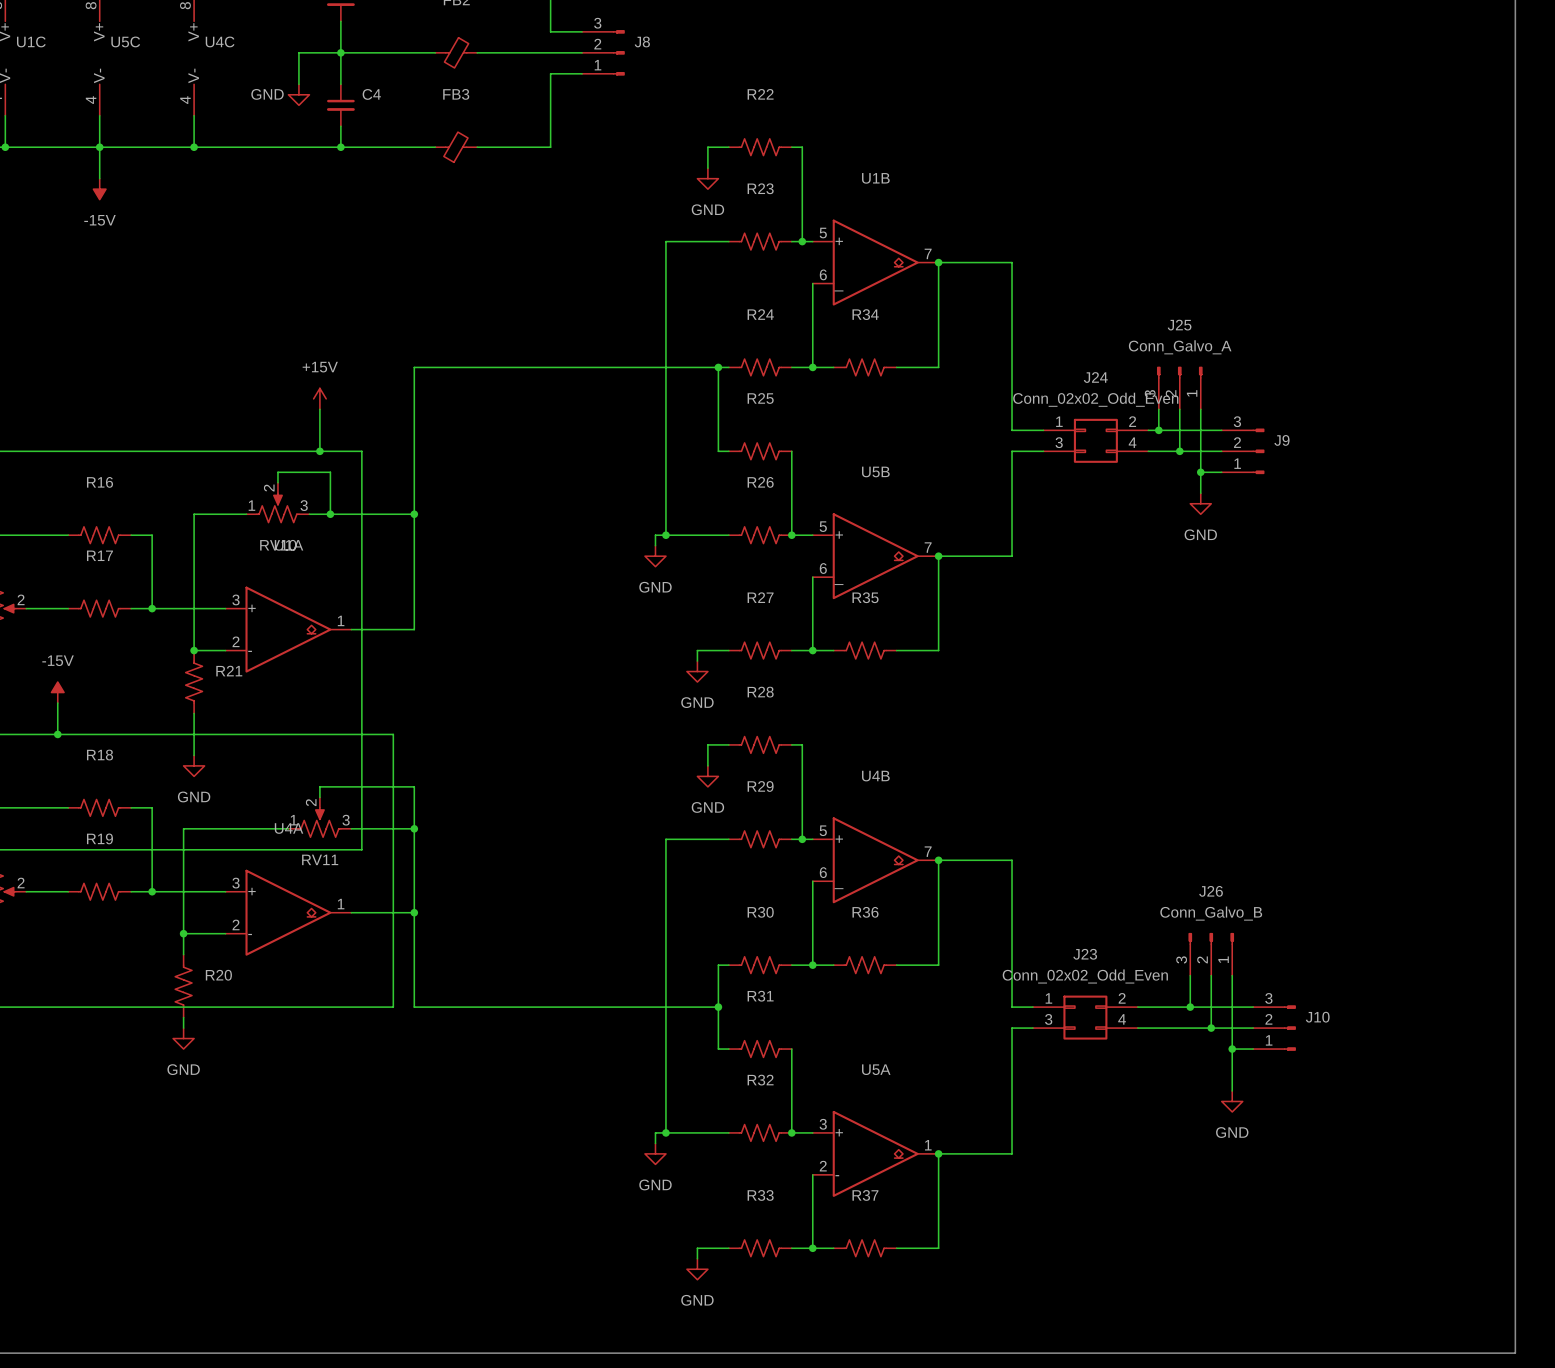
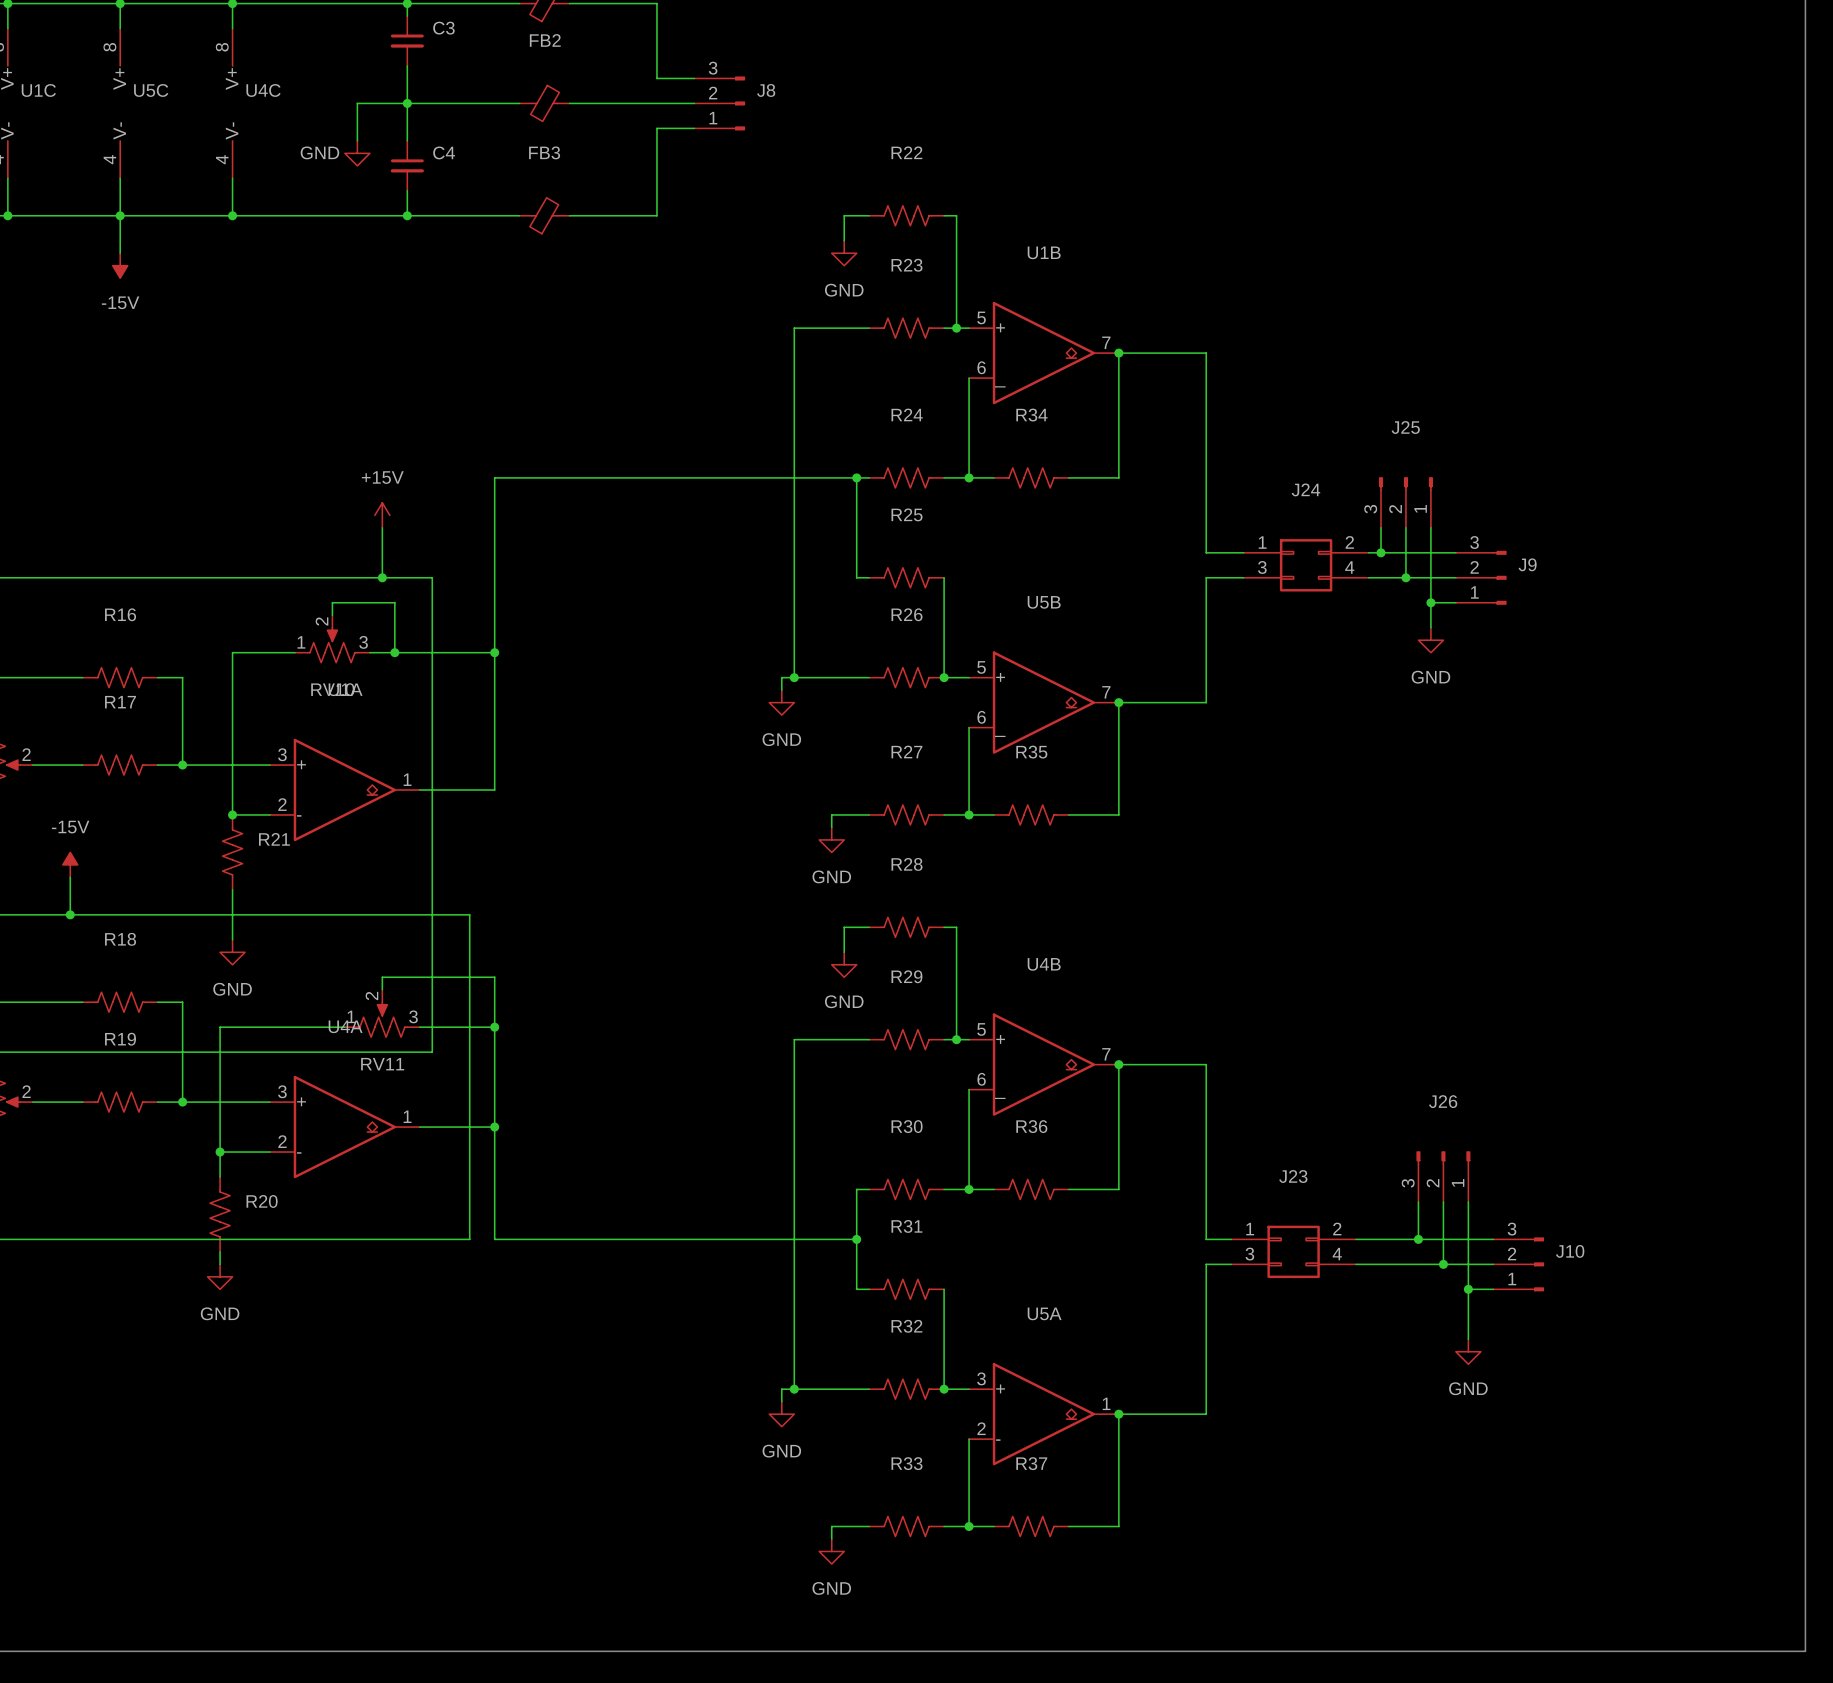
J25 value: Conn_Galvo_A (1180, 347) -> none
J24 value: Conn_02x02_Odd_Even (1095, 399) -> none
J26 value: Conn_Galvo_B (1211, 913) -> none
J23 value: Conn_02x02_Odd_Even (1085, 976) -> none

